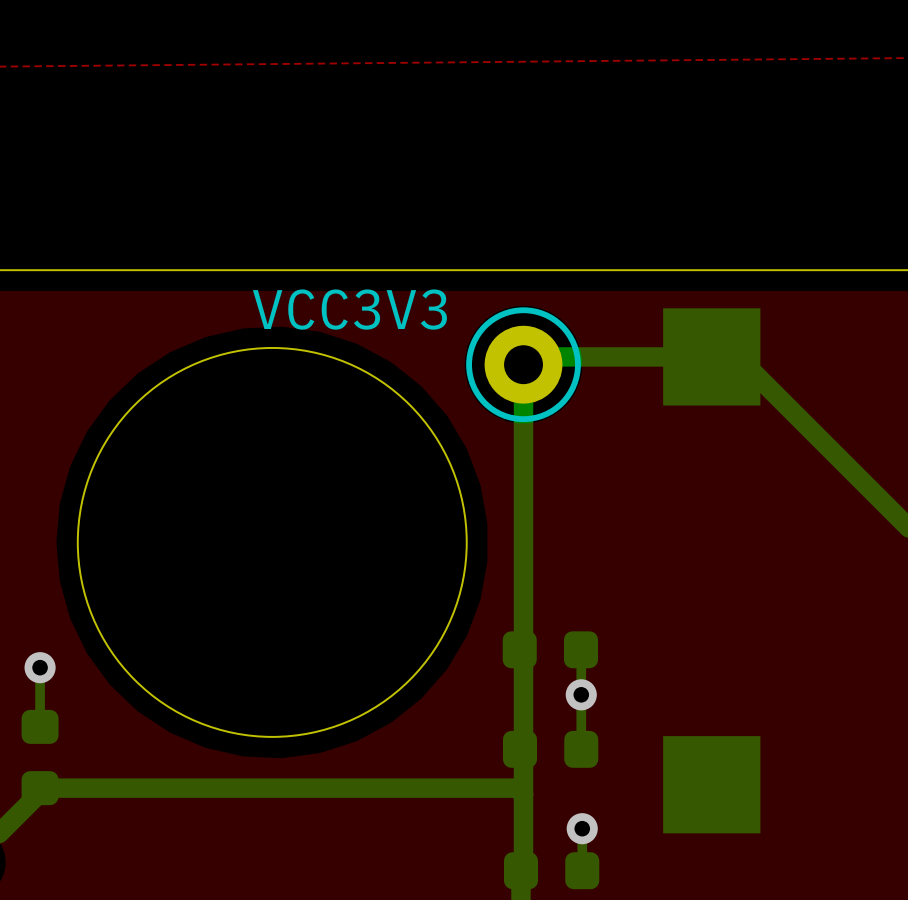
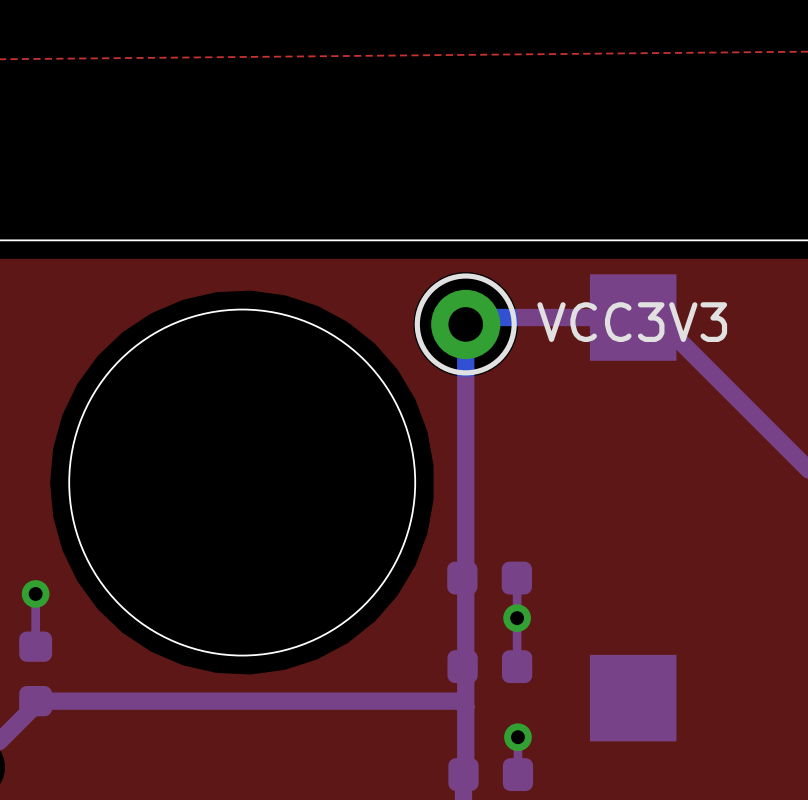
text position: VCC3V3 (349, 309) -> VCC3V3 (632, 322)

